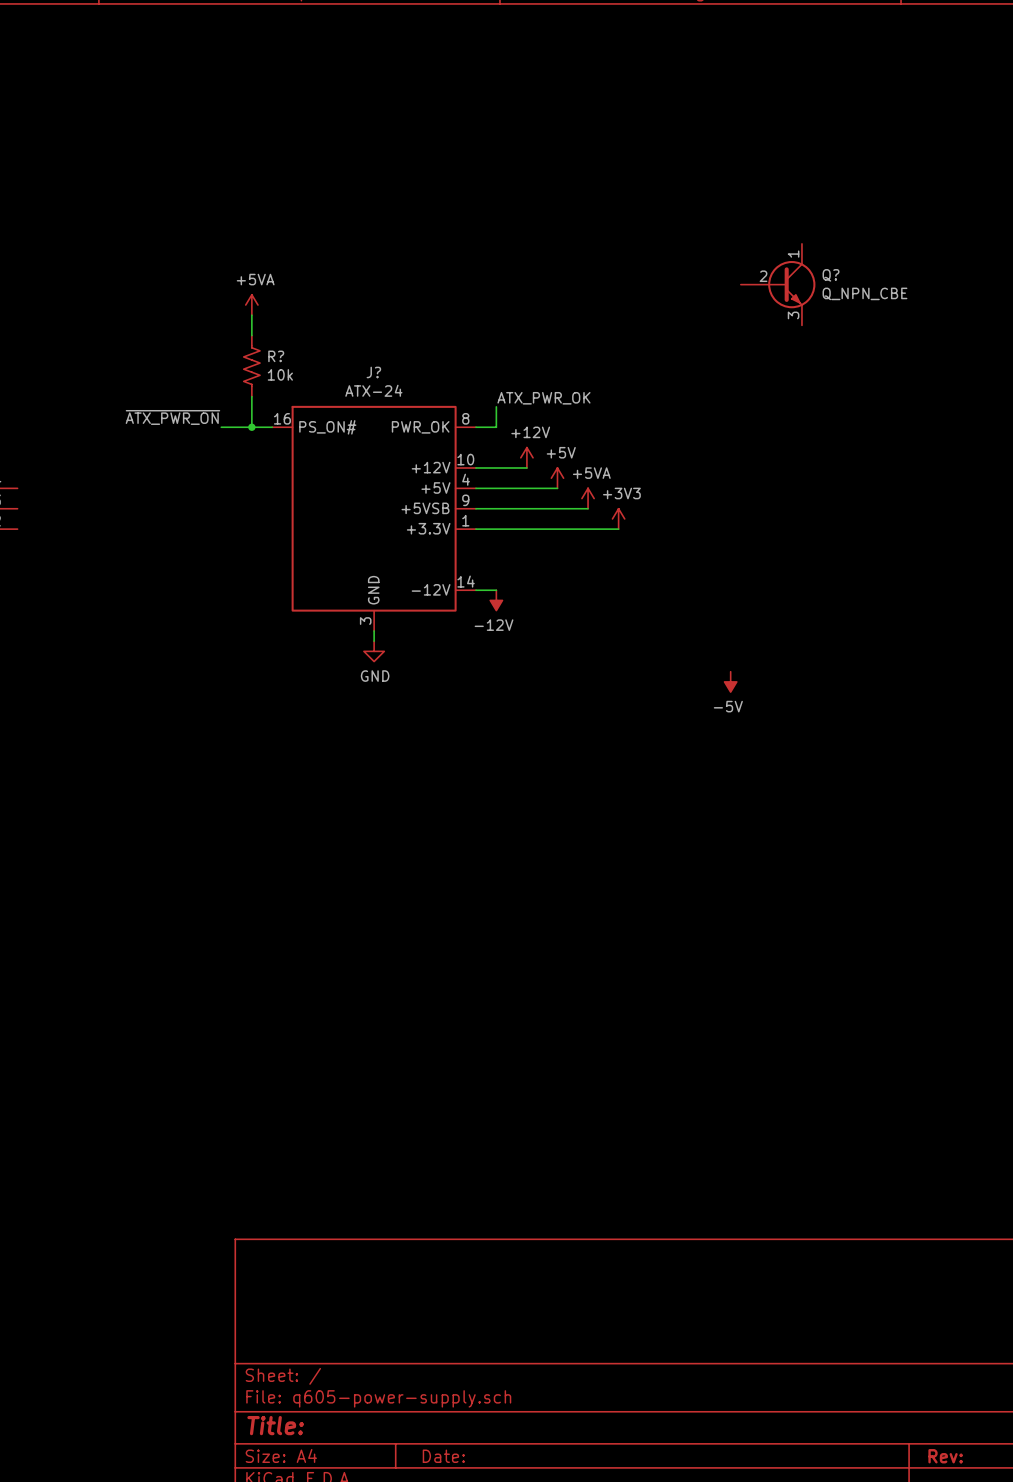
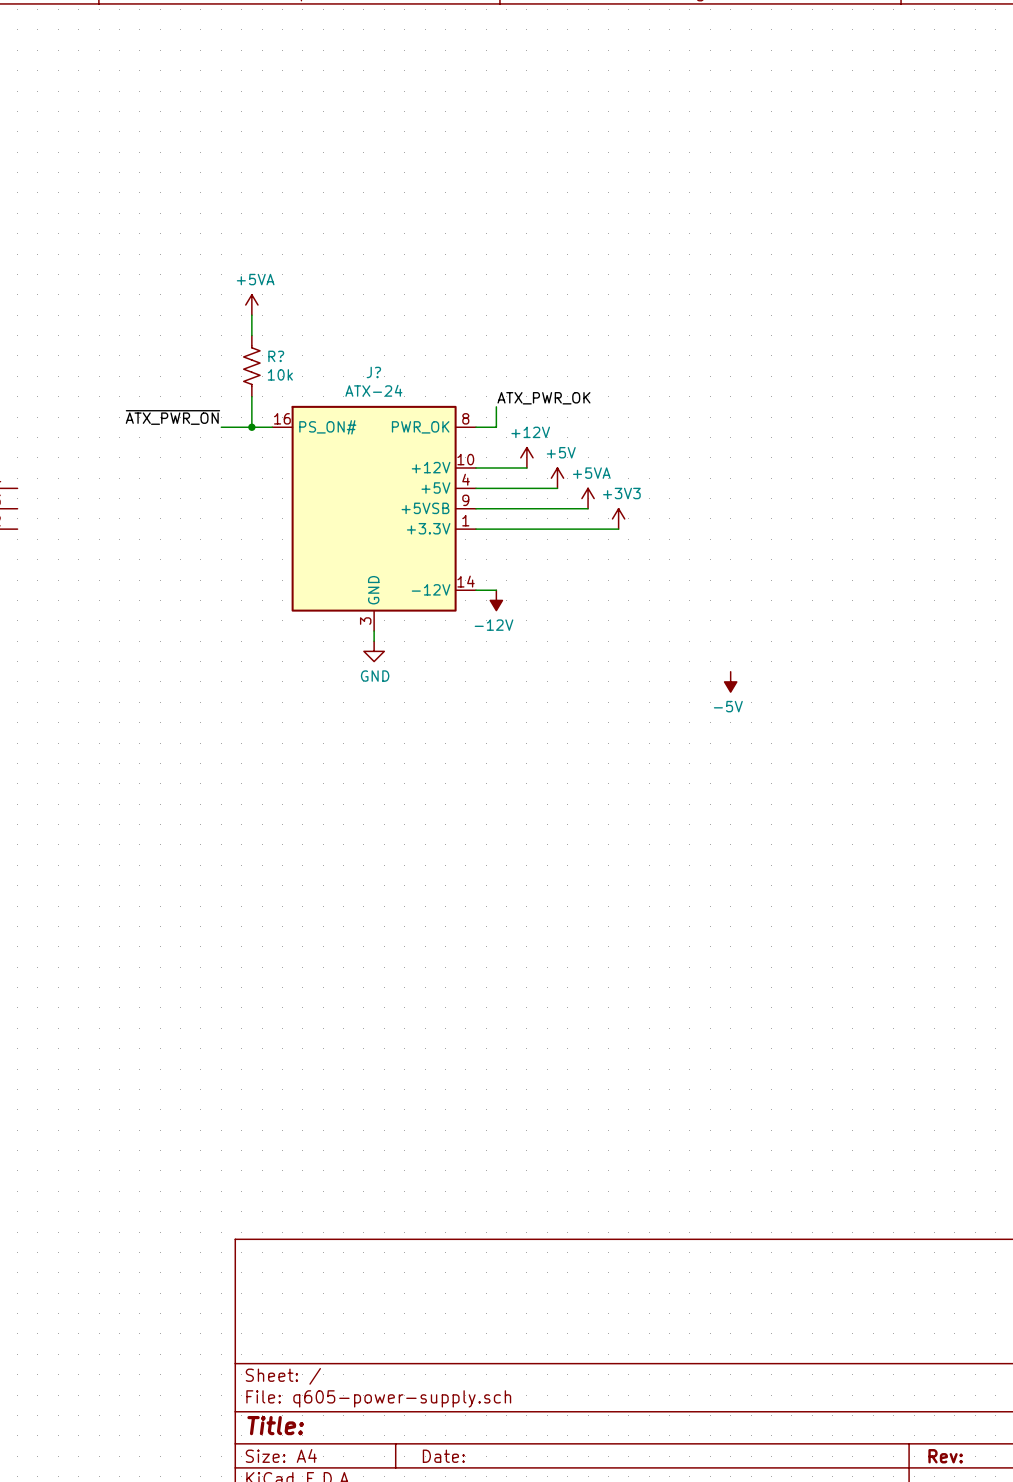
Q?: Q_NPN_CBE (778, 284) -> none

